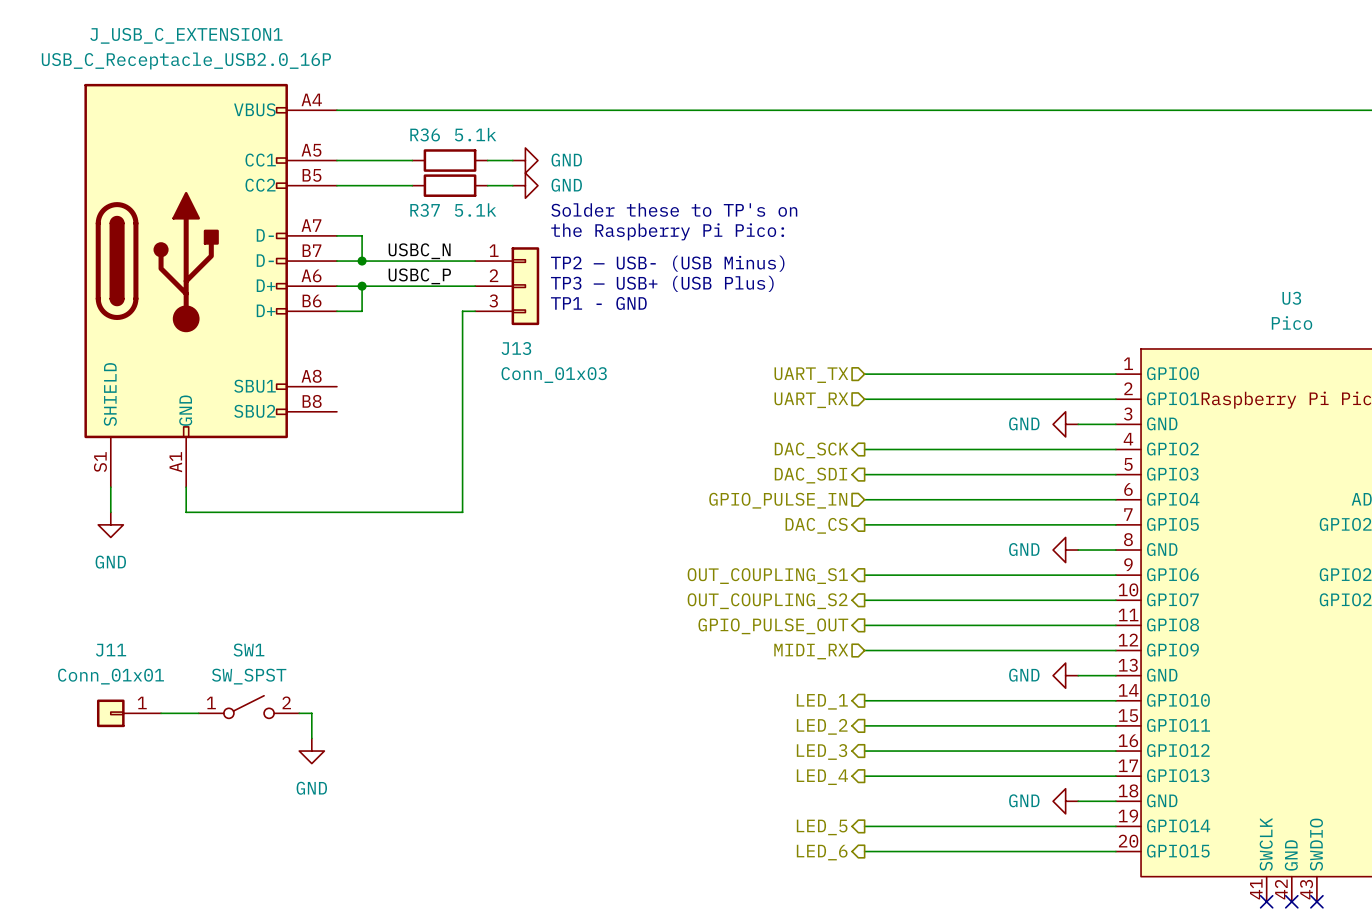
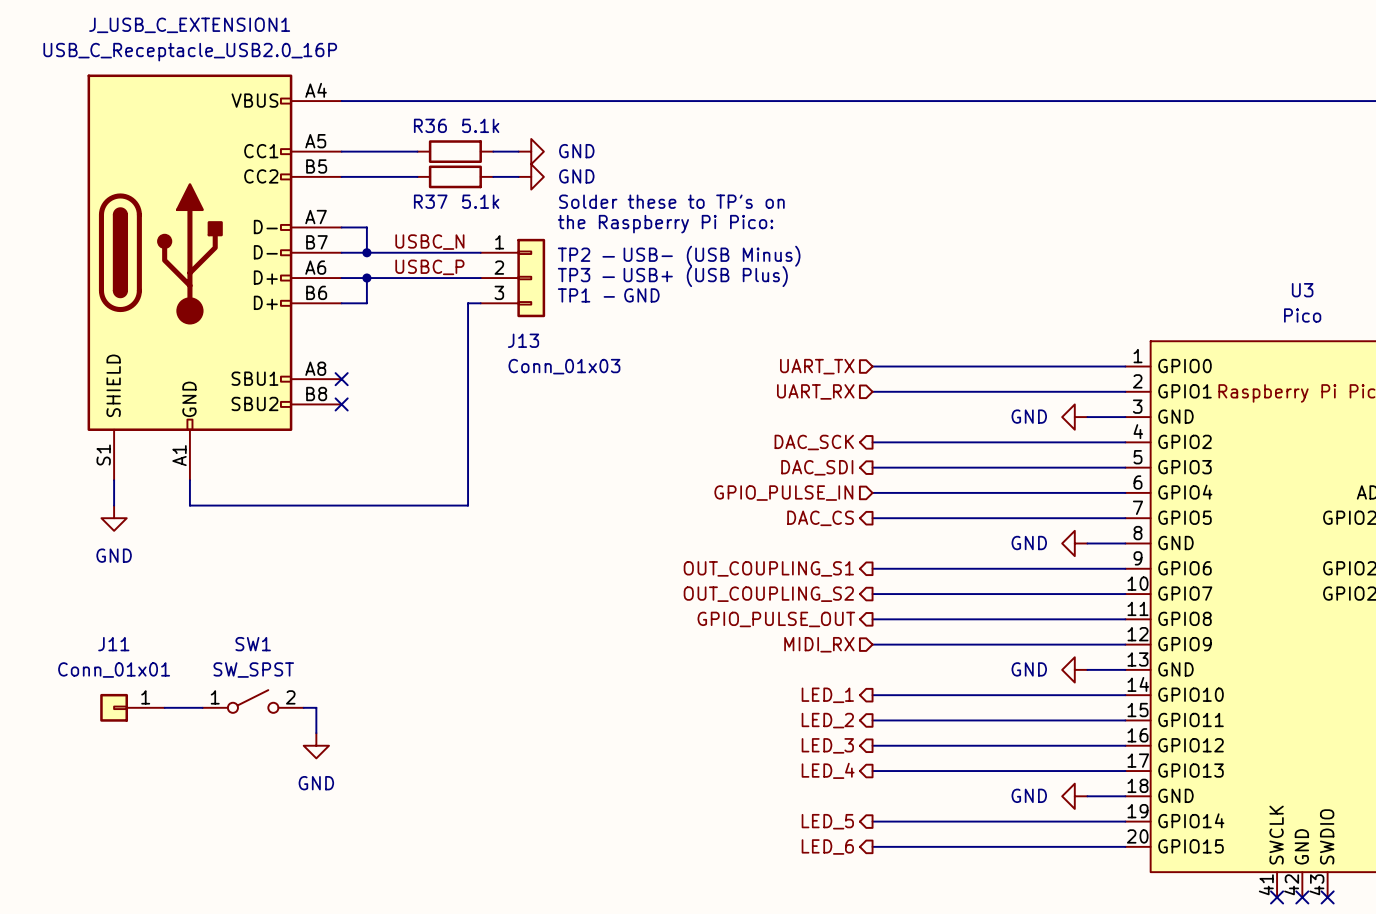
no-connect mark: none -> (341, 379)
no-connect mark: none -> (341, 404)

